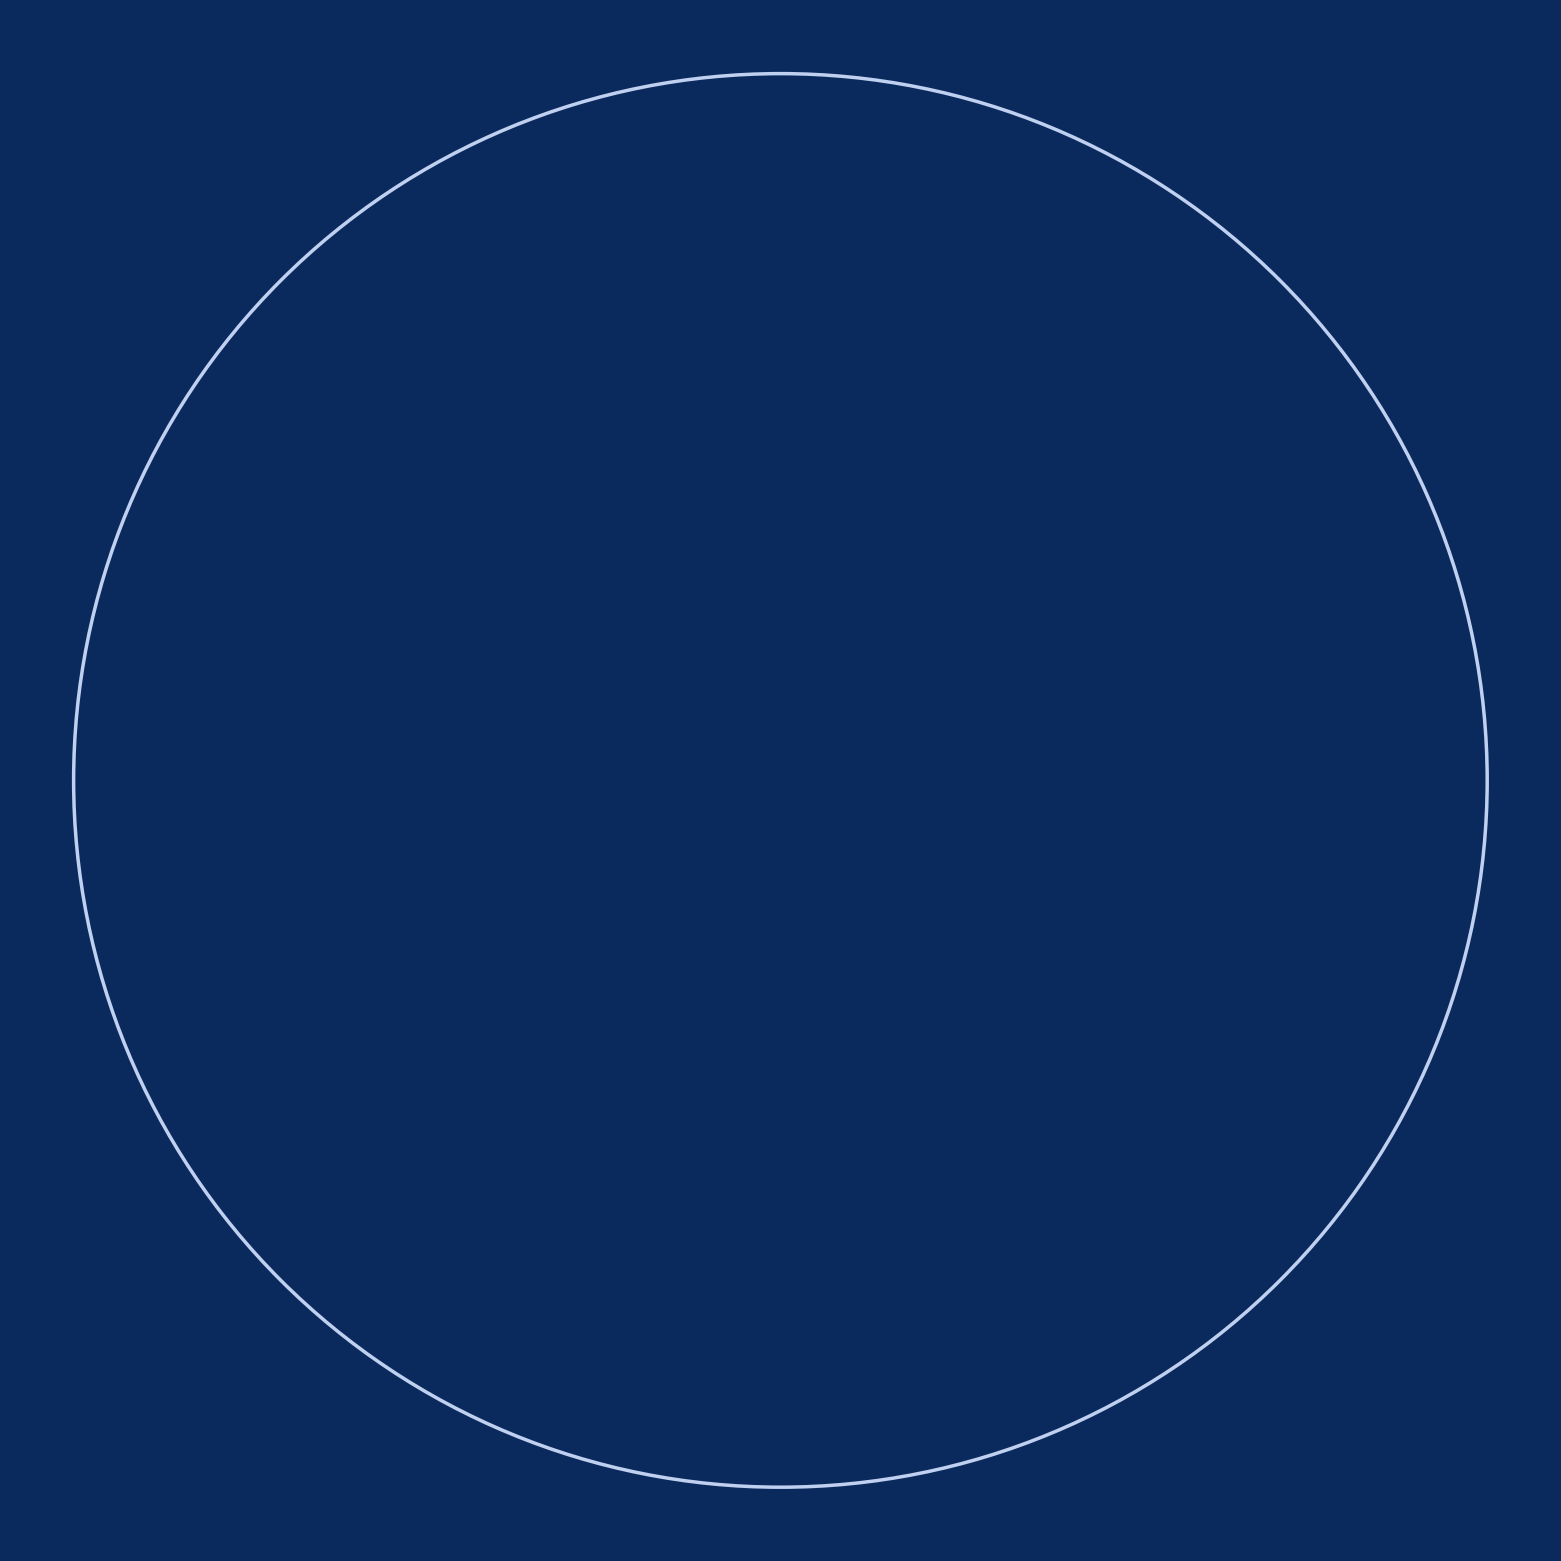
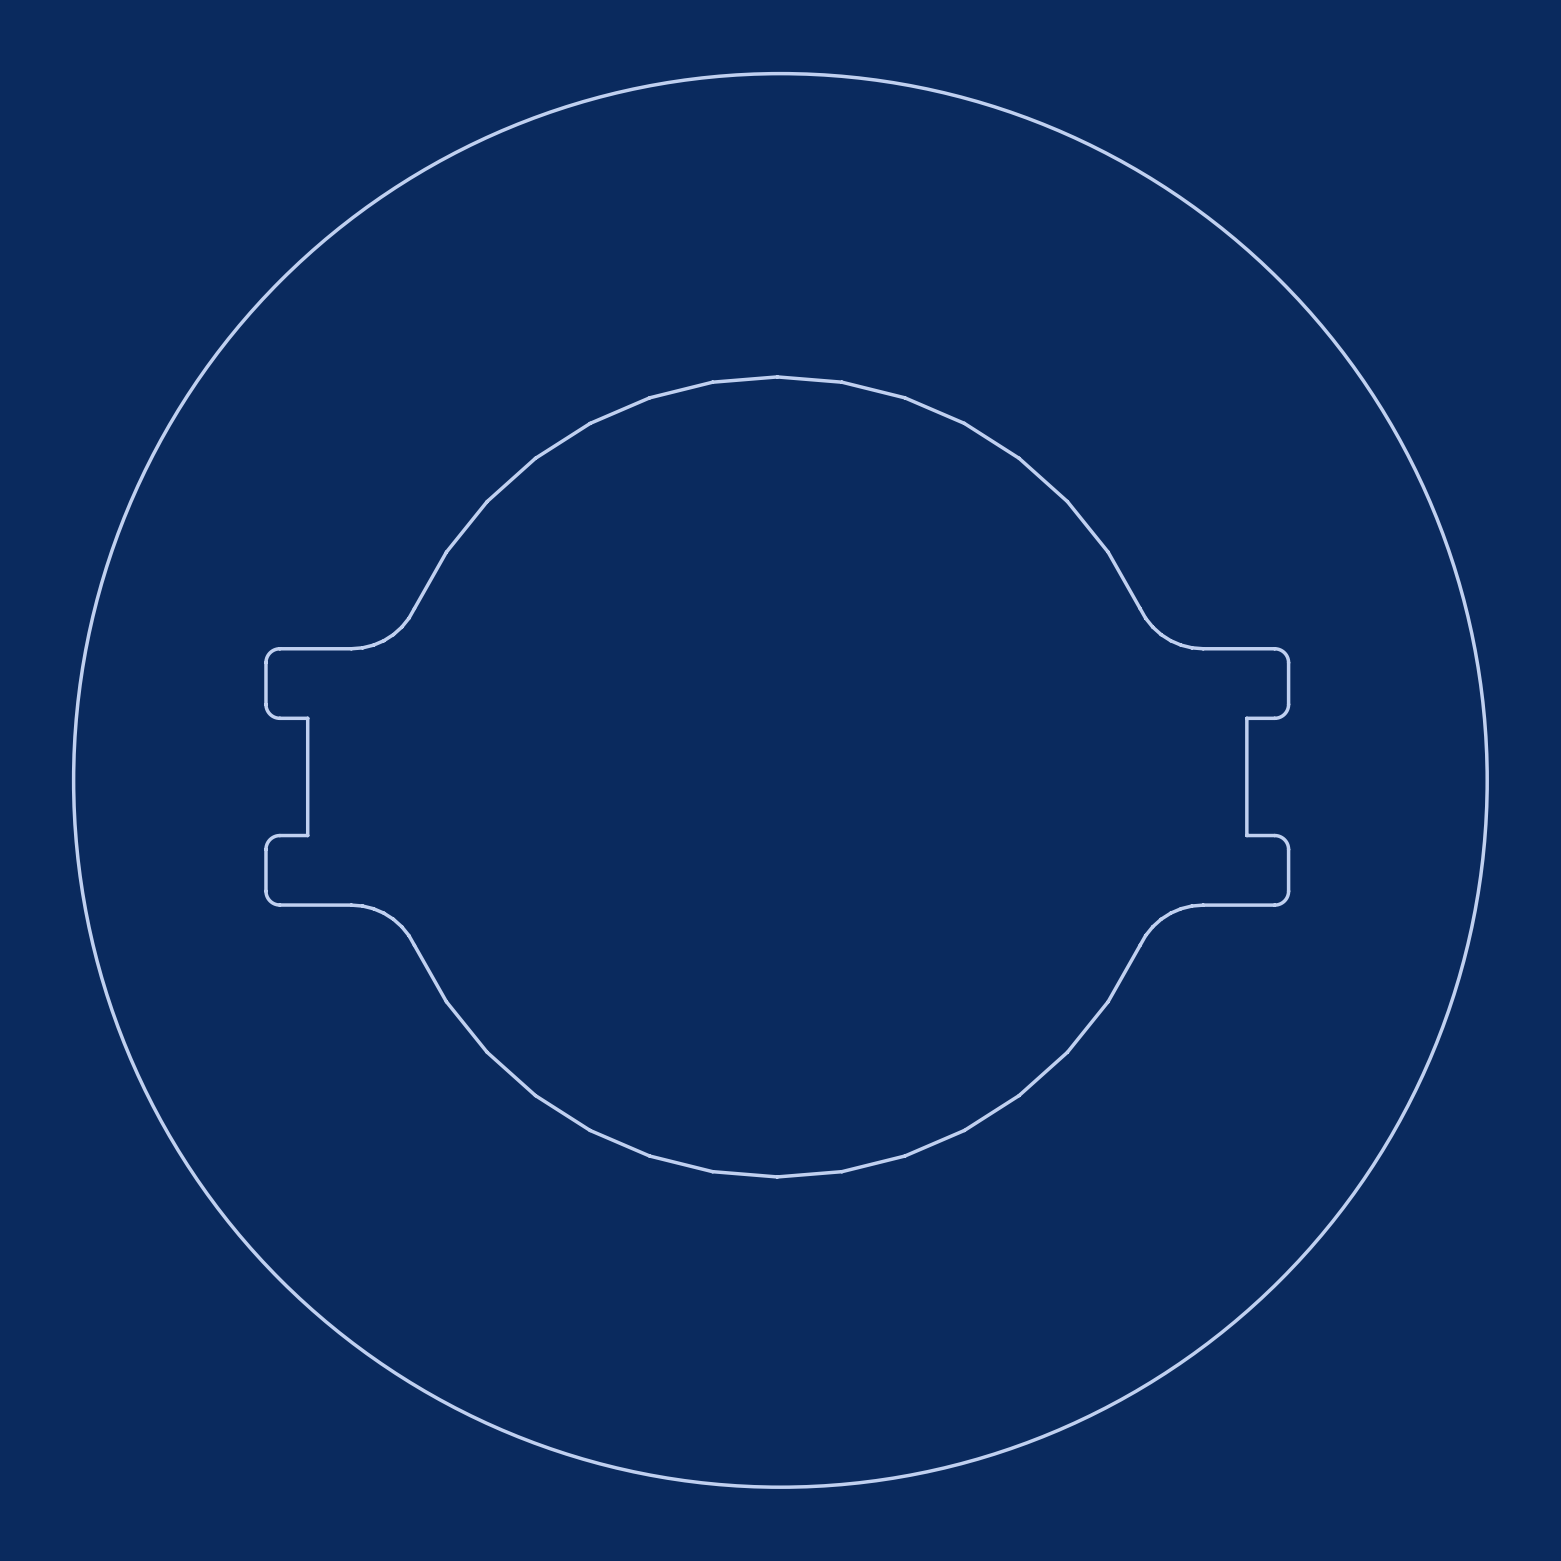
part: none -> (777, 776)

